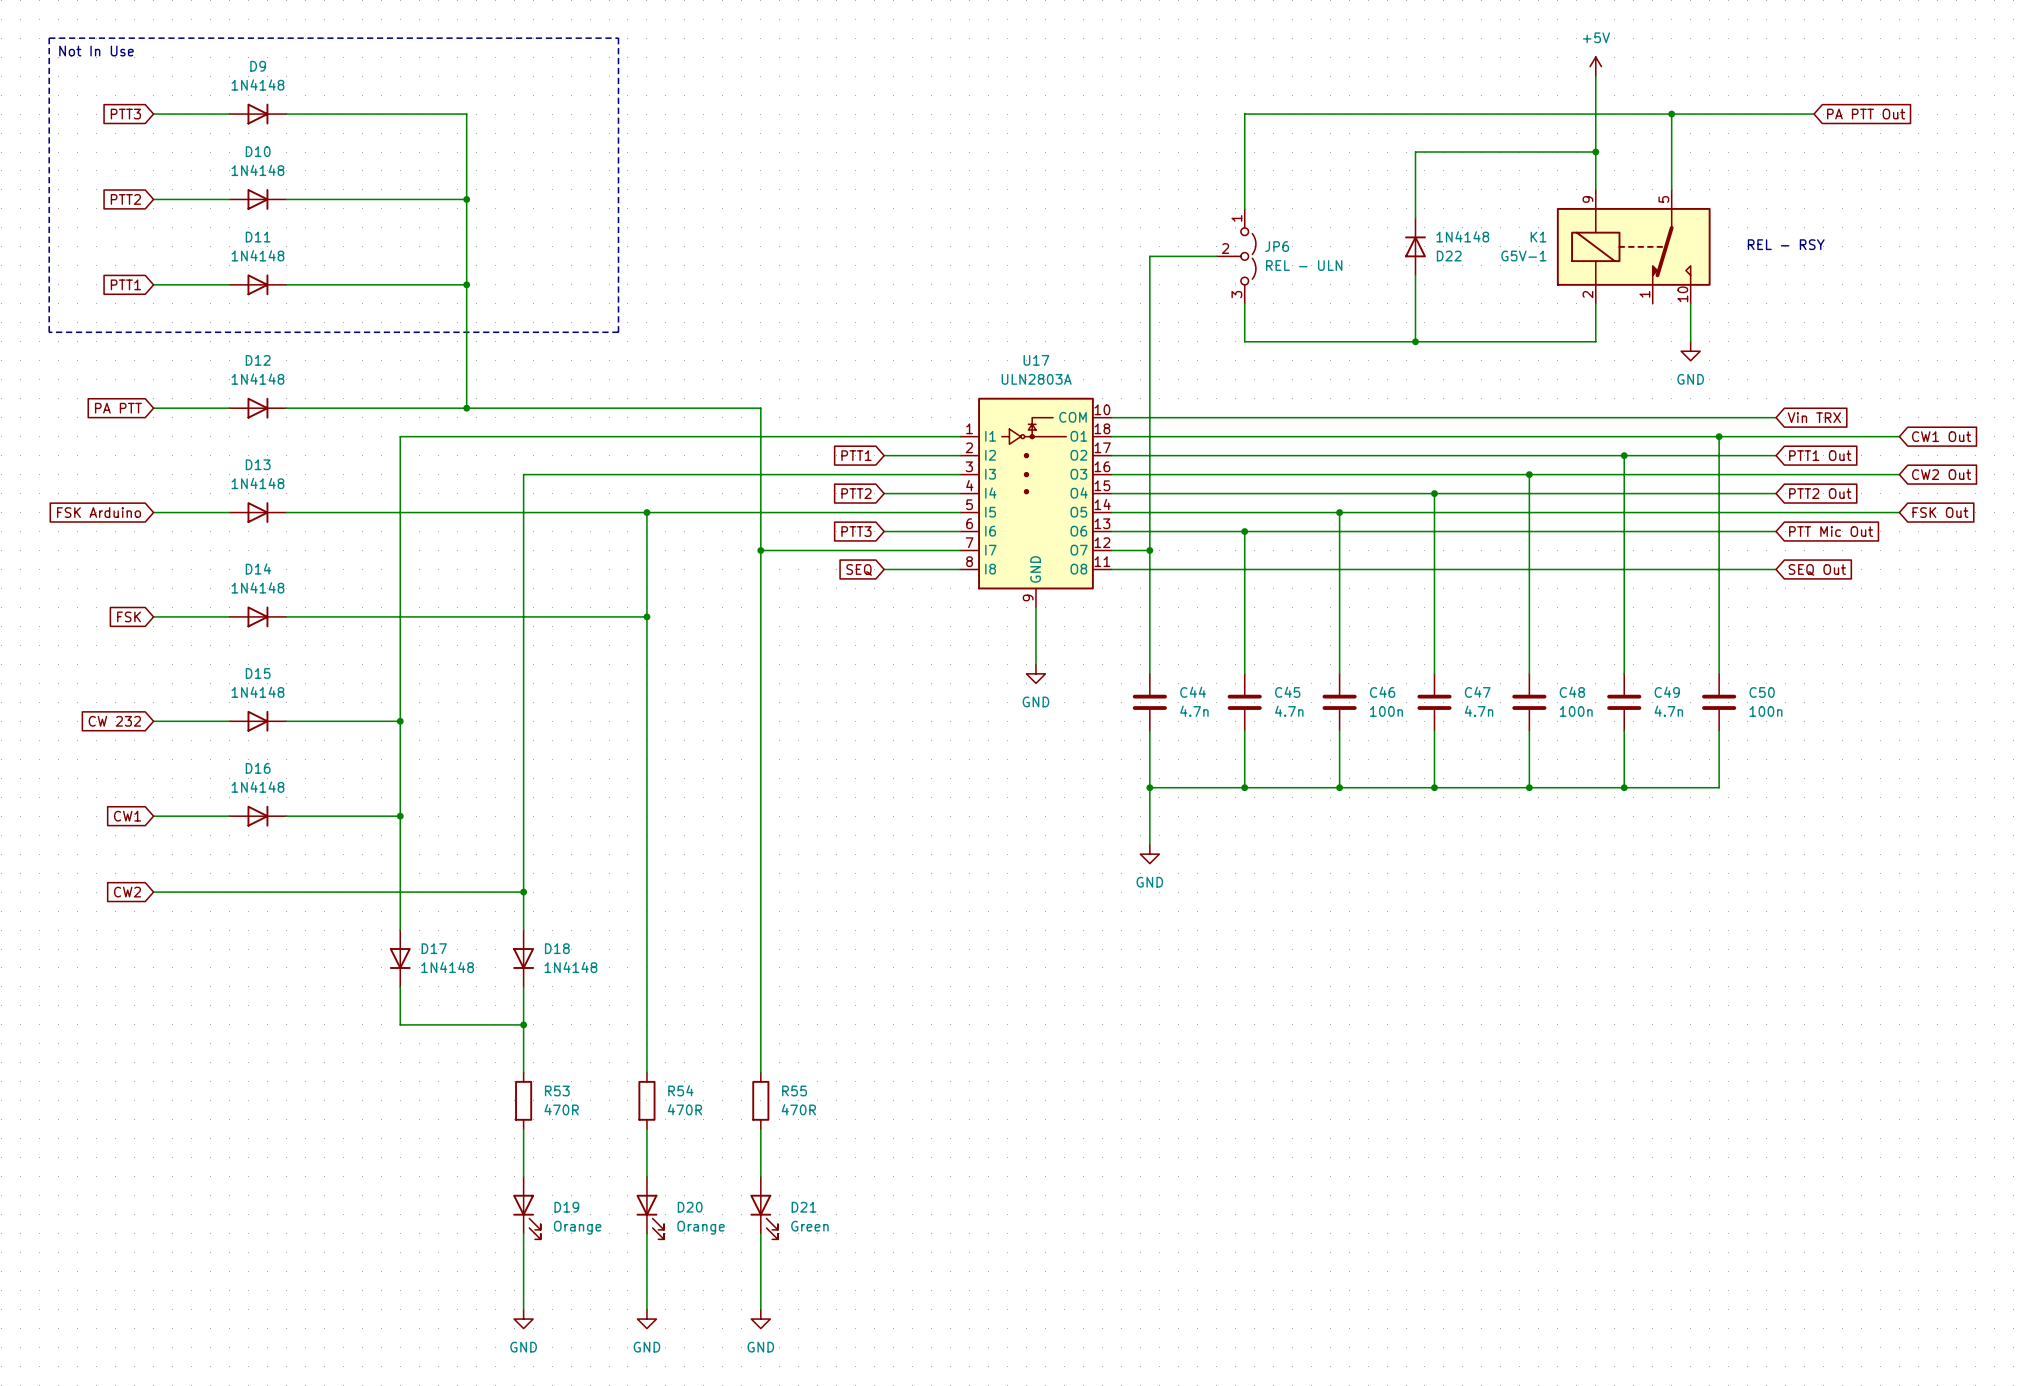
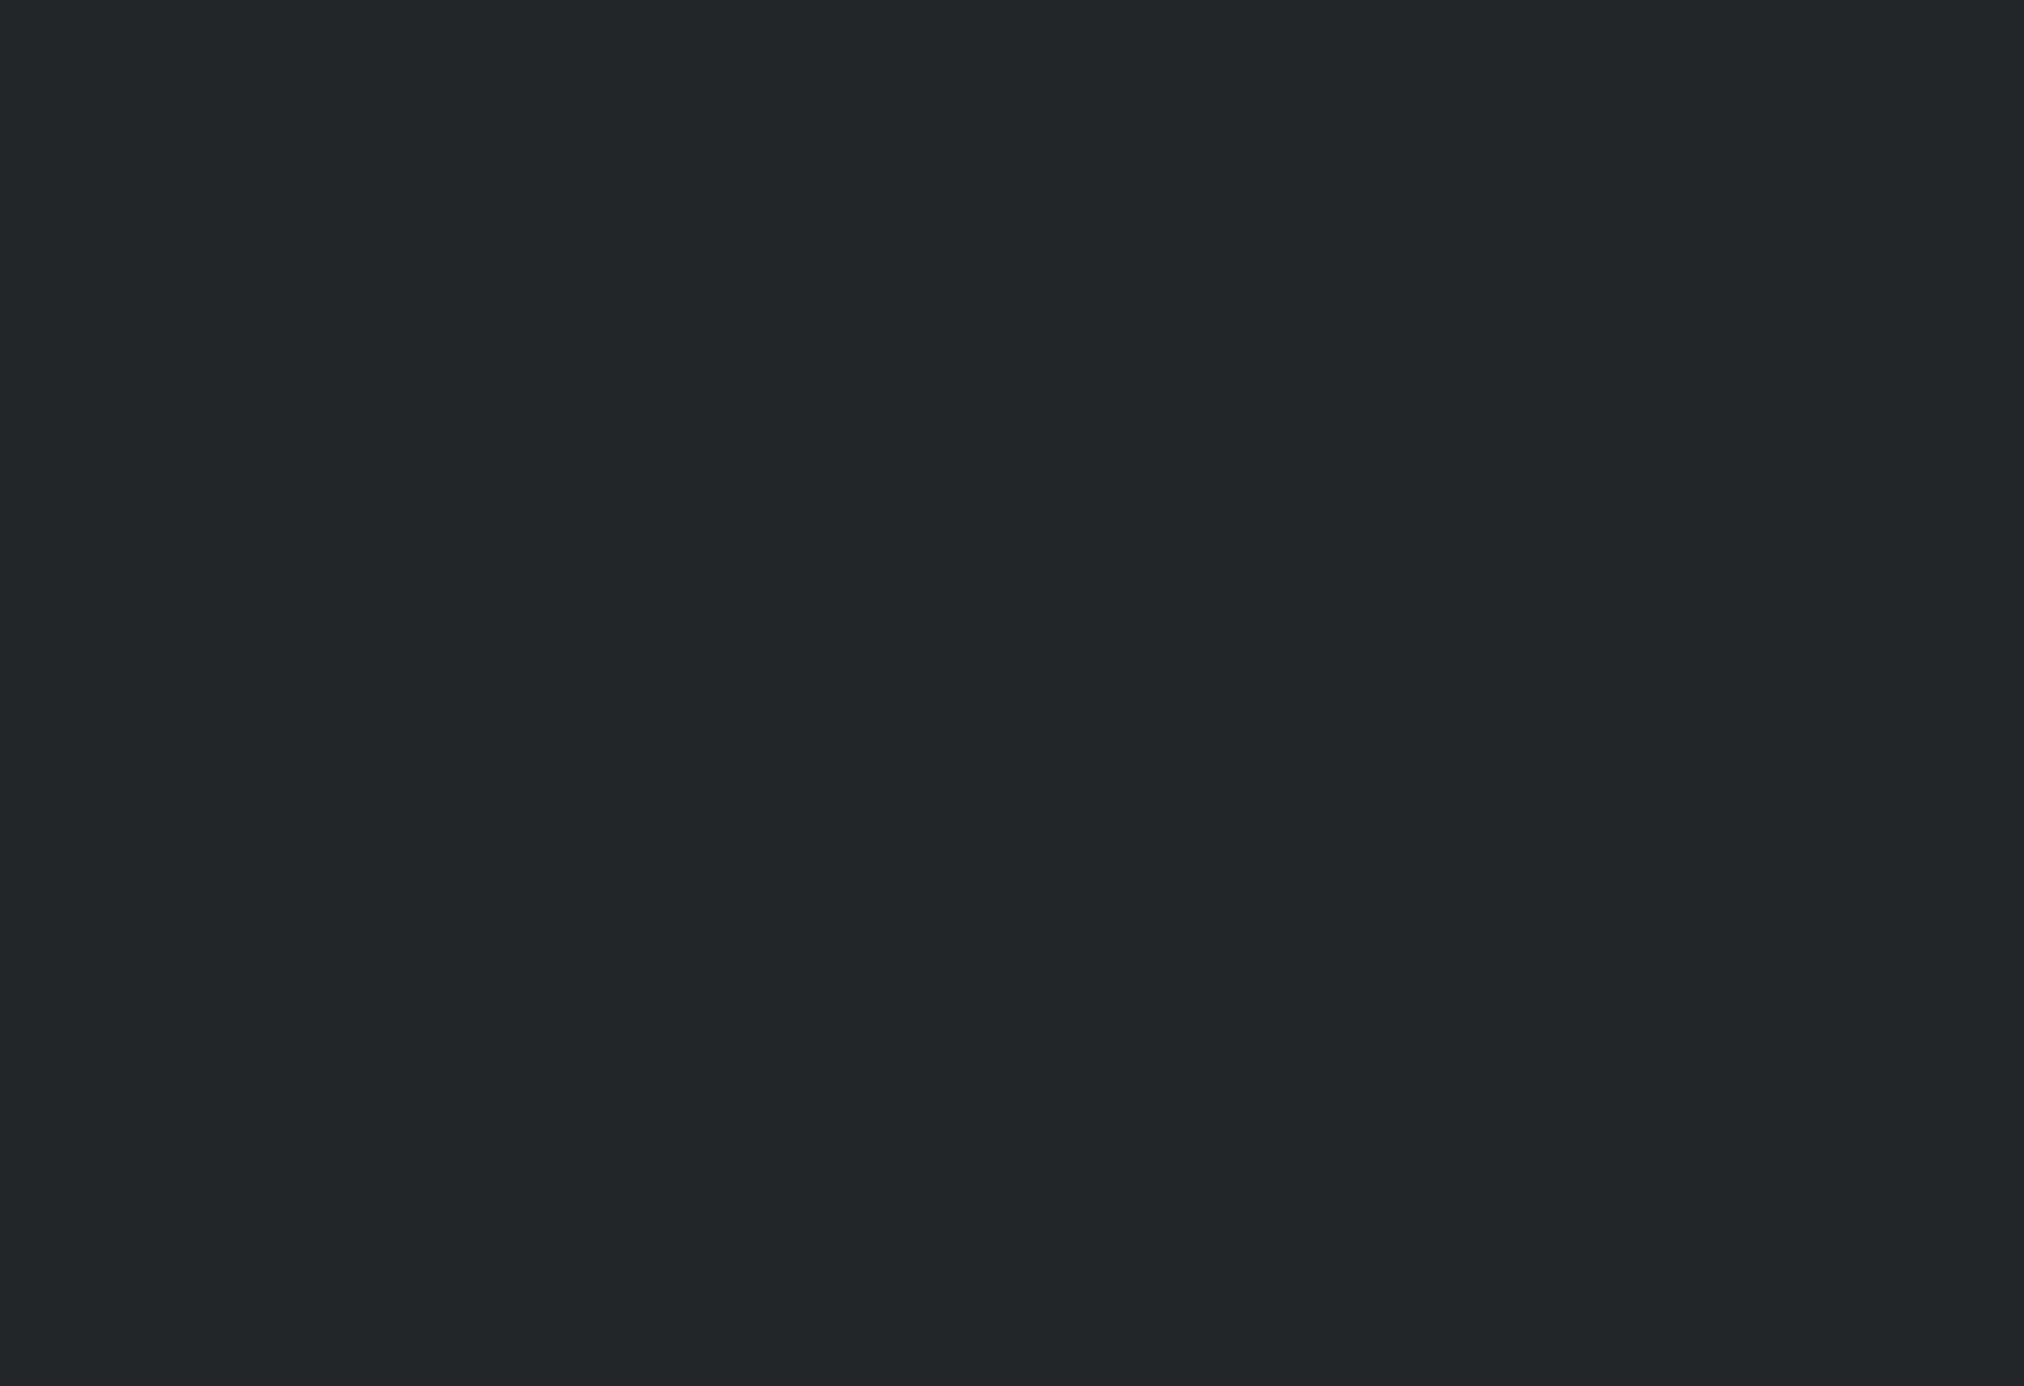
line: (49, 38) (618, 38) (618, 332) (49, 332) (49, 38) -> none
text: Not In Use (96, 51) -> none
power symbol: +5V (1595, 66) -> none
wire: (1595, 76) (1595, 189) -> none
global label: PTT3 (125, 114) -> none
wire: (153, 114) (229, 114) -> none
D9: 1N4148 (257, 114) -> none
wire: (286, 114) (466, 114) (466, 408) -> none
wire: (1671, 114) (1671, 189) -> none
junction: (1671, 114) -> none
wire: (1814, 114) (1244, 114) (1244, 208) -> none
global label: PA PTT Out (1866, 114) -> none
wire: (1595, 152) (1415, 152) (1415, 218) -> none
junction: (1595, 152) -> none
global label: PTT2 (125, 199) -> none
wire: (153, 199) (229, 199) -> none
D10: 1N4148 (257, 199) -> none
wire: (286, 199) (466, 199) -> none
junction: (466, 199) -> none
text: REL - RSY (1786, 244) -> none
D22: 1N4148 (1415, 246) -> none
K1: G5V-1 (1633, 246) -> none
wire: (1216, 256) (1149, 256) (1149, 673) -> none
JP6: REL - ULN (1236, 256) -> none
wire: (1415, 275) (1415, 341) -> none
global label: PTT1 (125, 284) -> none
wire: (153, 284) (229, 284) -> none
D11: 1N4148 (257, 284) -> none
wire: (286, 284) (466, 284) -> none
junction: (466, 284) -> none
wire: (1244, 303) (1244, 341) (1595, 341) (1595, 303) -> none
wire: (1690, 303) (1690, 341) -> none
junction: (1415, 341) -> none
power symbol: GND (1690, 351) -> none
global label: PA PTT (118, 408) -> none
wire: (153, 408) (229, 408) -> none
D12: 1N4148 (257, 408) -> none
wire: (286, 408) (760, 408) (760, 1072) -> none
junction: (466, 408) -> none
wire: (1111, 417) (1776, 417) -> none
global label: Vin TRX (1814, 417) -> none
wire: (960, 436) (400, 436) (400, 930) -> none
wire: (1111, 436) (1899, 436) -> none
wire: (1719, 436) (1719, 673) -> none
junction: (1719, 436) -> none
global label: CW1 Out (1941, 436) -> none
global label: PTT1 (856, 455) -> none
wire: (884, 455) (960, 455) -> none
wire: (1111, 455) (1776, 455) -> none
wire: (1624, 455) (1624, 673) -> none
junction: (1624, 455) -> none
global label: PTT1 Out (1820, 455) -> none
wire: (960, 474) (523, 474) (523, 930) -> none
wire: (1111, 474) (1899, 474) -> none
wire: (1529, 474) (1529, 673) -> none
junction: (1529, 474) -> none
global label: CW2 Out (1941, 474) -> none
global label: PTT2 (856, 493) -> none
wire: (884, 493) (960, 493) -> none
wire: (1111, 493) (1776, 493) -> none
wire: (1434, 493) (1434, 673) -> none
junction: (1434, 493) -> none
global label: PTT2 Out (1820, 493) -> none
U17: ULN2803A (1035, 502) -> none
global label: FSK Arduino (99, 512) -> none
wire: (153, 512) (229, 512) -> none
D13: 1N4148 (257, 512) -> none
wire: (286, 512) (960, 512) -> none
wire: (646, 512) (646, 1072) -> none
junction: (646, 512) -> none
wire: (1111, 512) (1899, 512) -> none
wire: (1339, 512) (1339, 673) -> none
junction: (1339, 512) -> none
global label: FSK Out (1940, 512) -> none
global label: PTT3 (856, 531) -> none
wire: (884, 531) (960, 531) -> none
wire: (1111, 531) (1776, 531) -> none
wire: (1244, 531) (1244, 673) -> none
junction: (1244, 531) -> none
global label: PTT Mic Out (1831, 531) -> none
wire: (760, 550) (960, 550) -> none
junction: (760, 550) -> none
wire: (1111, 550) (1149, 550) -> none
junction: (1149, 550) -> none
global label: SEQ (859, 569) -> none
wire: (884, 569) (960, 569) -> none
wire: (1111, 569) (1776, 569) -> none
global label: SEQ Out (1817, 569) -> none
wire: (1035, 607) (1035, 664) -> none
global label: FSK (129, 616) -> none
wire: (153, 616) (229, 616) -> none
D14: 1N4148 (257, 616) -> none
wire: (286, 616) (646, 616) -> none
junction: (646, 616) -> none
power symbol: GND (1035, 673) -> none
C44: 4.7n (1149, 702) -> none
C45: 4.7n (1244, 702) -> none
C46: 100n (1339, 702) -> none
C47: 4.7n (1434, 702) -> none
C48: 100n (1529, 702) -> none
C49: 4.7n (1624, 702) -> none
C50: 100n (1719, 702) -> none
global label: CW 232 (114, 721) -> none
wire: (153, 721) (229, 721) -> none
D15: 1N4148 (257, 721) -> none
wire: (286, 721) (400, 721) -> none
junction: (400, 721) -> none
wire: (1149, 730) (1149, 844) -> none
wire: (1244, 730) (1244, 787) -> none
wire: (1339, 730) (1339, 787) -> none
wire: (1434, 730) (1434, 787) -> none
wire: (1529, 730) (1529, 787) -> none
wire: (1624, 730) (1624, 787) -> none
wire: (1719, 730) (1719, 787) (1149, 787) -> none
junction: (1149, 787) -> none
junction: (1244, 787) -> none
junction: (1339, 787) -> none
junction: (1434, 787) -> none
junction: (1529, 787) -> none
junction: (1624, 787) -> none
global label: CW1 (127, 816) -> none
wire: (153, 816) (229, 816) -> none
D16: 1N4148 (257, 816) -> none
wire: (286, 816) (400, 816) -> none
junction: (400, 816) -> none
power symbol: GND (1149, 854) -> none
global label: CW2 (127, 892) -> none
wire: (153, 892) (523, 892) -> none
junction: (523, 892) -> none
D17: 1N4148 (400, 958) -> none
D18: 1N4148 (523, 958) -> none
wire: (400, 986) (400, 1024) (523, 1024) -> none
wire: (523, 986) (523, 1072) -> none
junction: (523, 1024) -> none
R53: 470R (523, 1100) -> none
R54: 470R (646, 1100) -> none
R55: 470R (760, 1100) -> none
wire: (523, 1129) (523, 1176) -> none
wire: (646, 1129) (646, 1176) -> none
wire: (760, 1129) (760, 1176) -> none
D19: Orange (526, 1208) -> none
D20: Orange (650, 1208) -> none
D21: Green (764, 1208) -> none
wire: (523, 1233) (523, 1309) -> none
wire: (646, 1233) (646, 1309) -> none
wire: (760, 1233) (760, 1309) -> none
power symbol: GND (523, 1319) -> none
power symbol: GND (646, 1319) -> none
power symbol: GND (760, 1319) -> none

